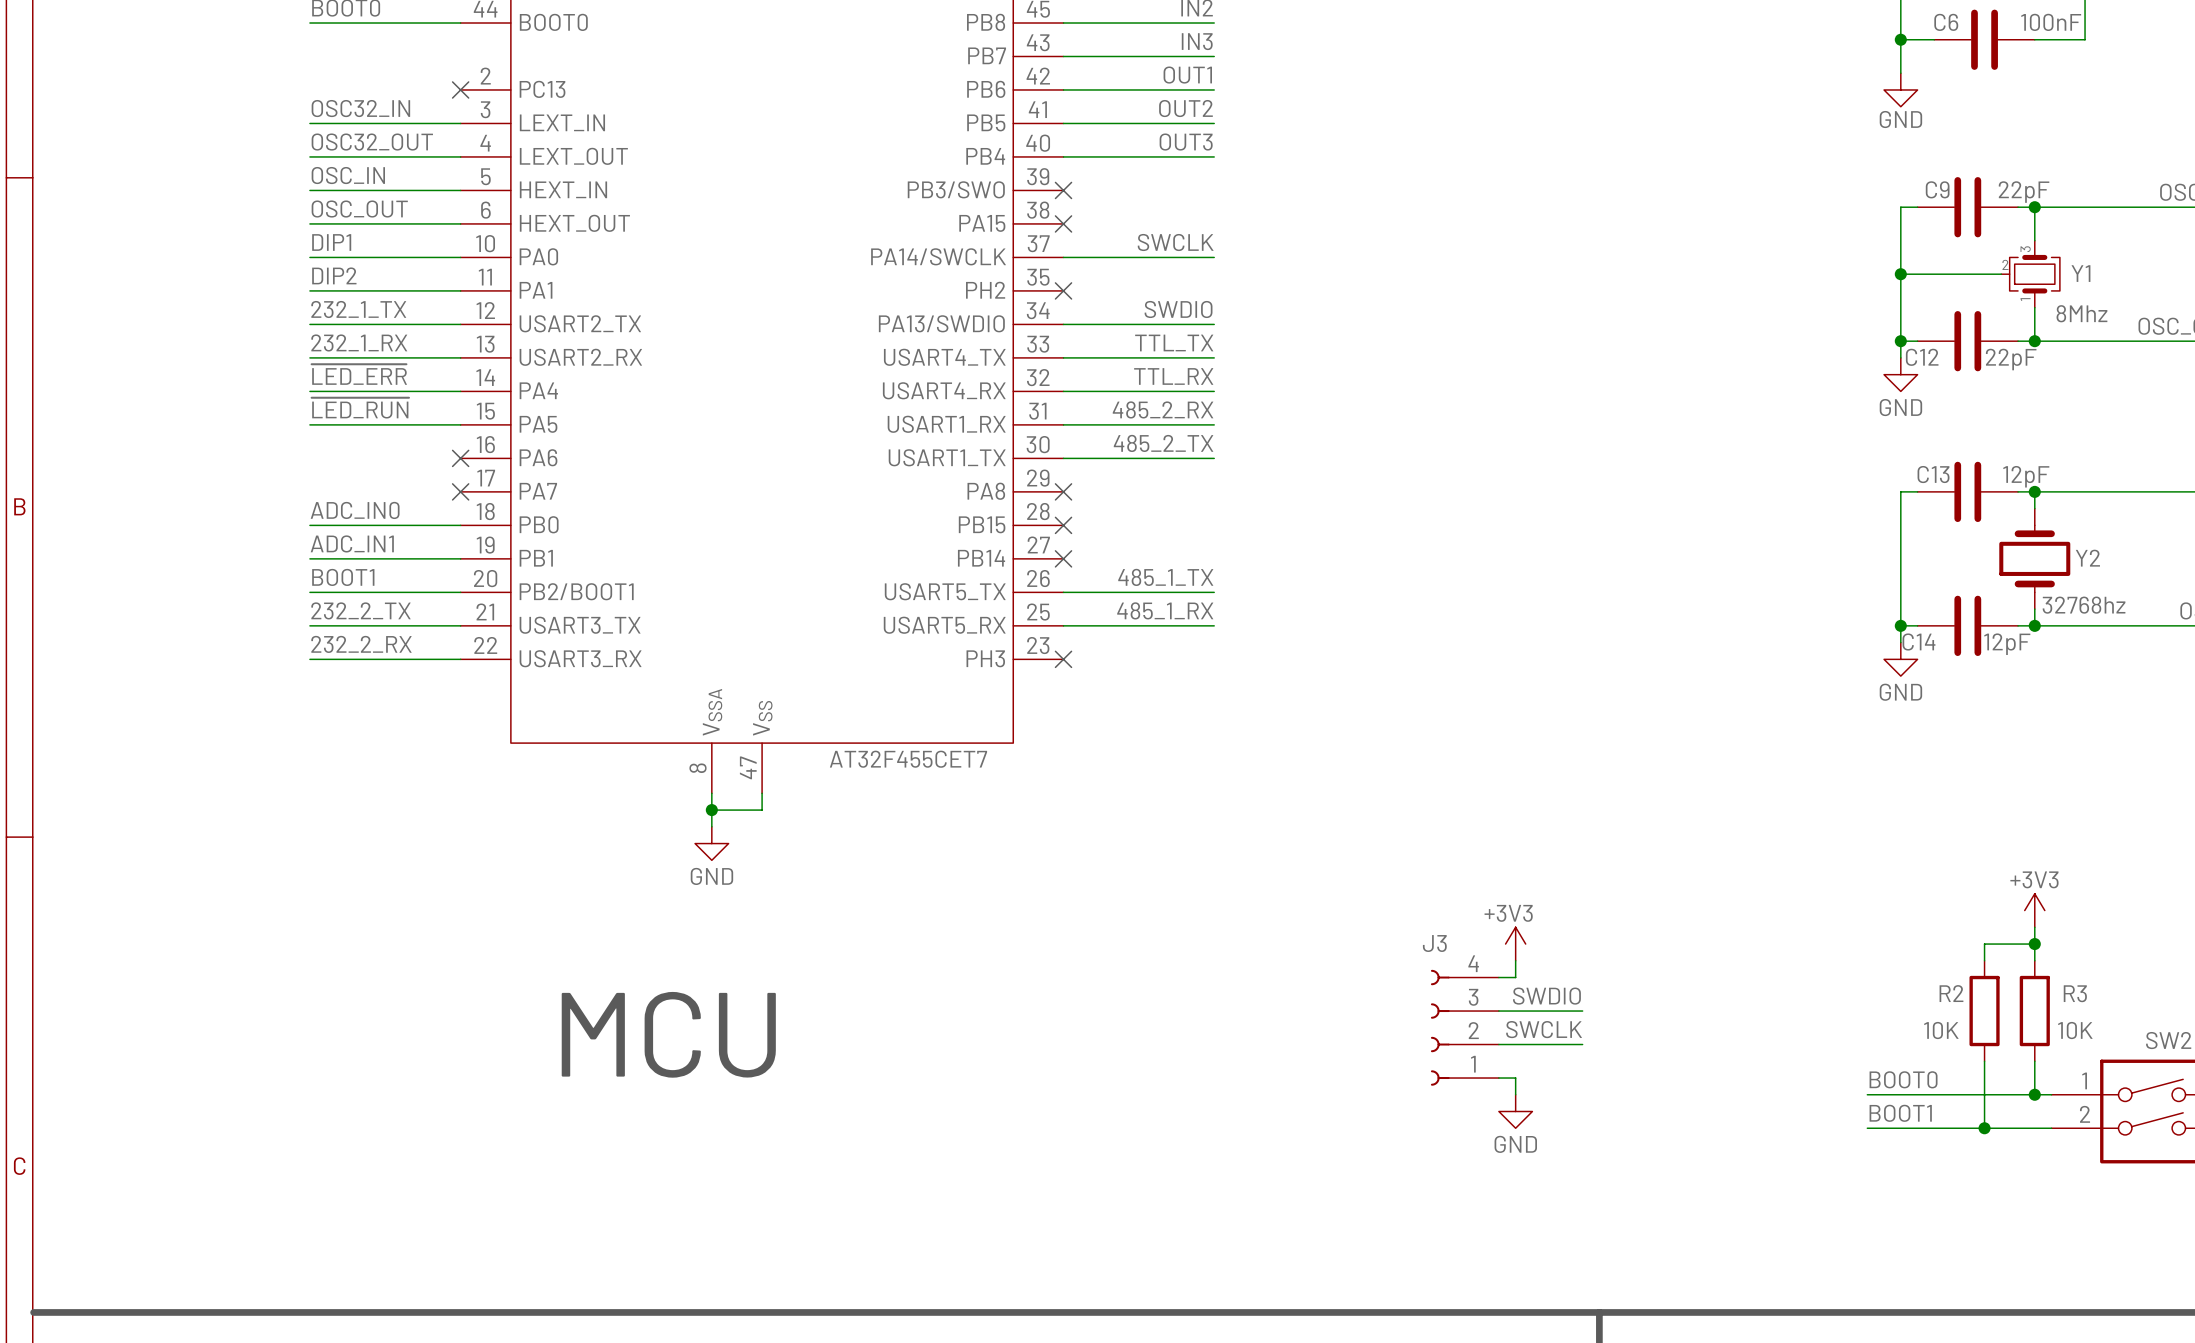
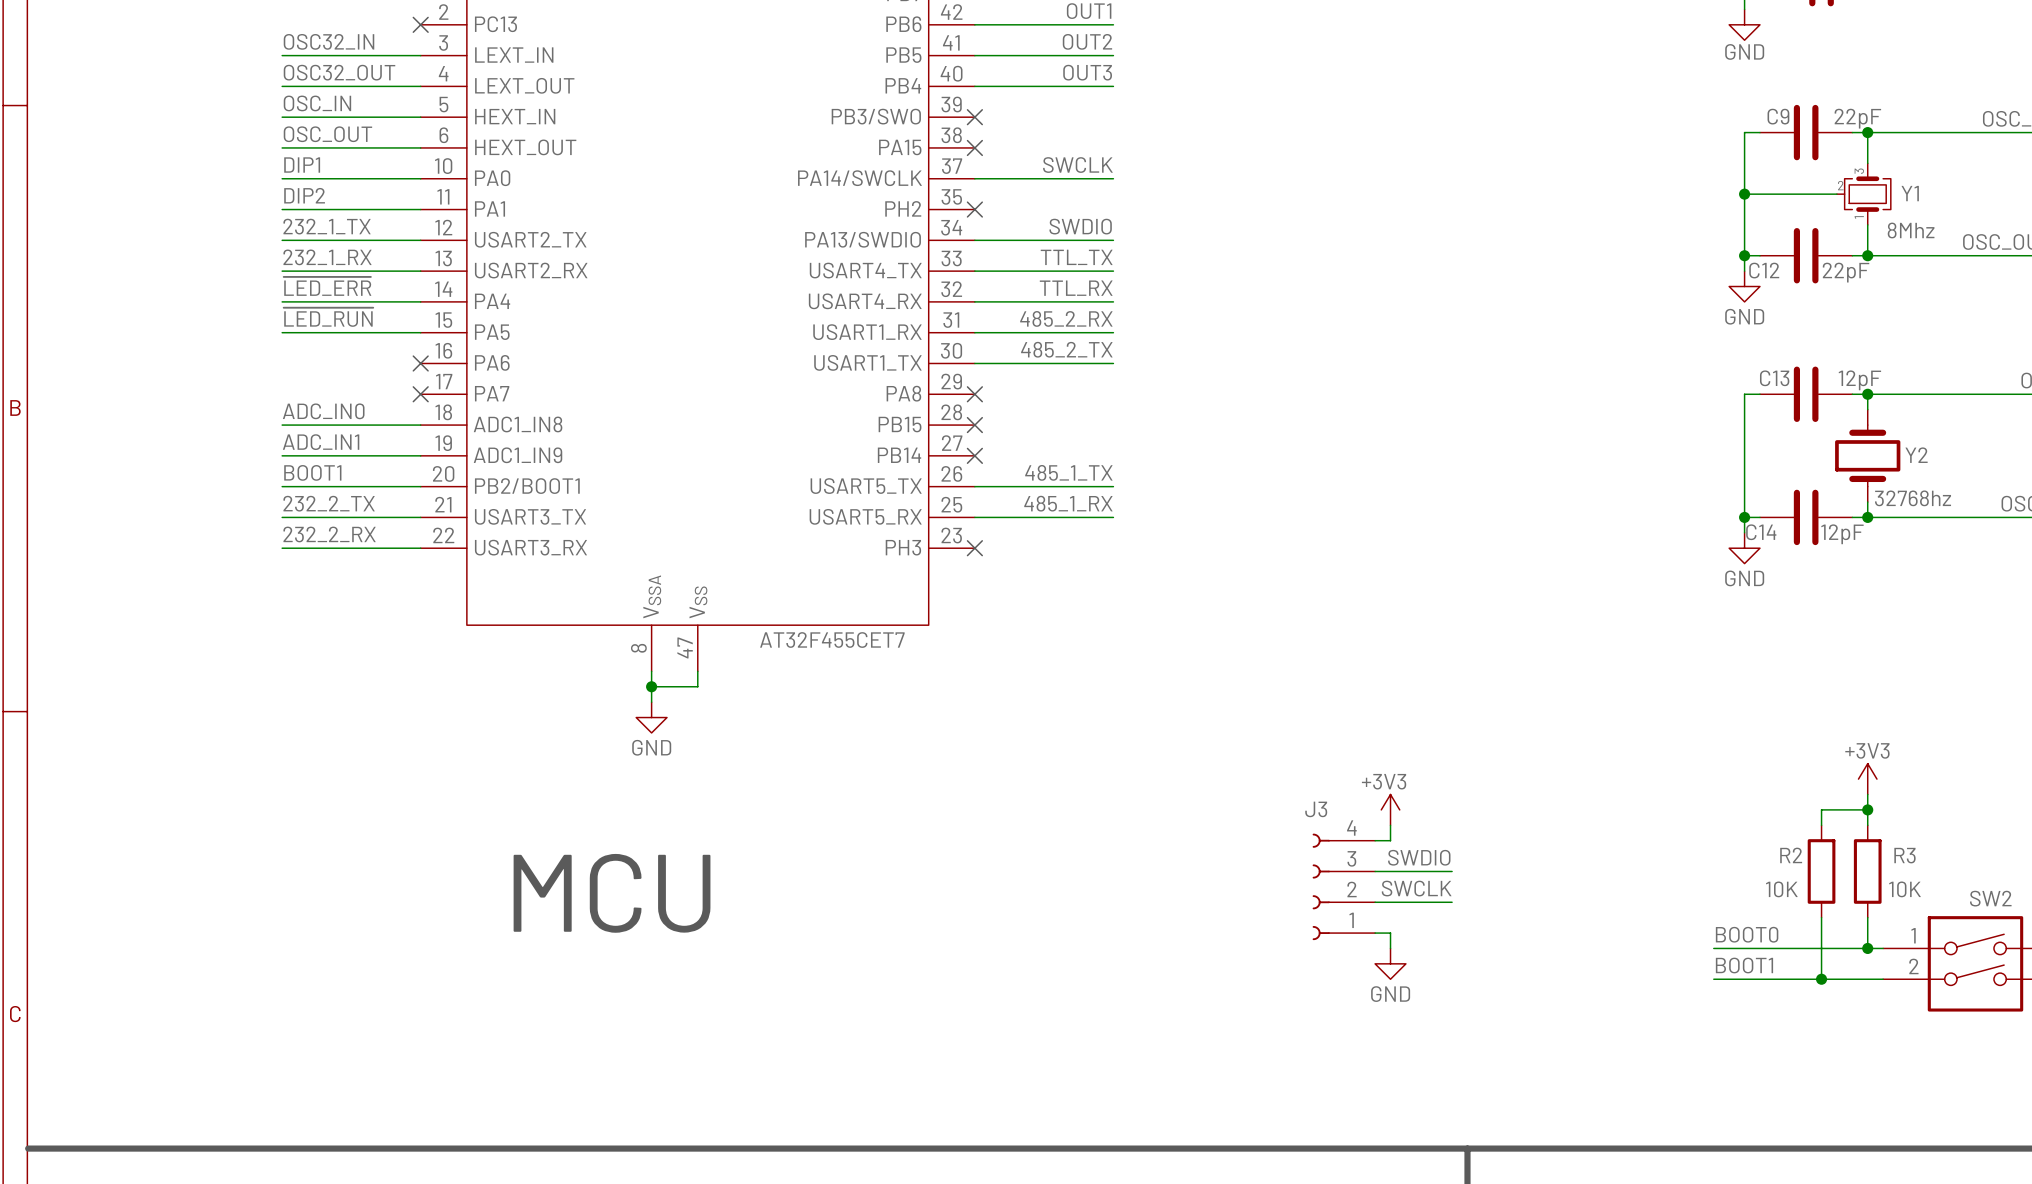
part pin name: PB0 (539, 524) -> ADC1_IN8 (518, 424)
part pin name: PB1 (536, 558) -> ADC1_IN9 (518, 455)

